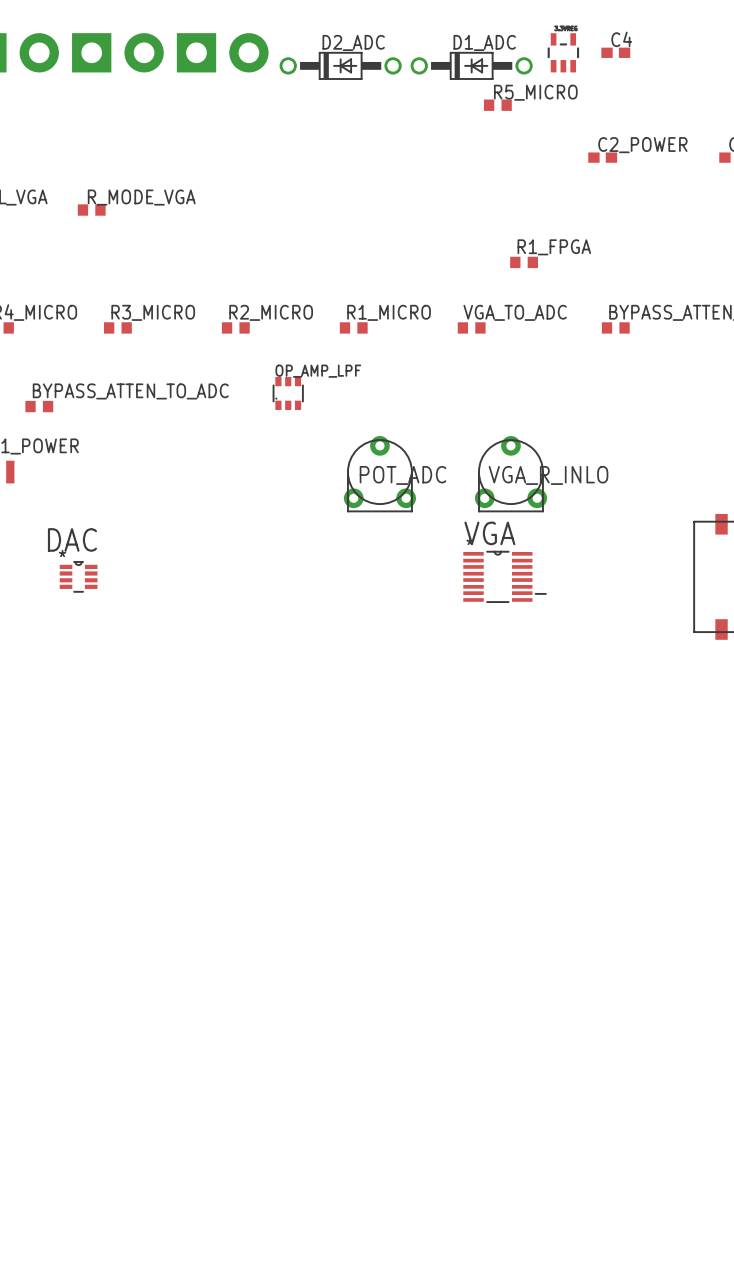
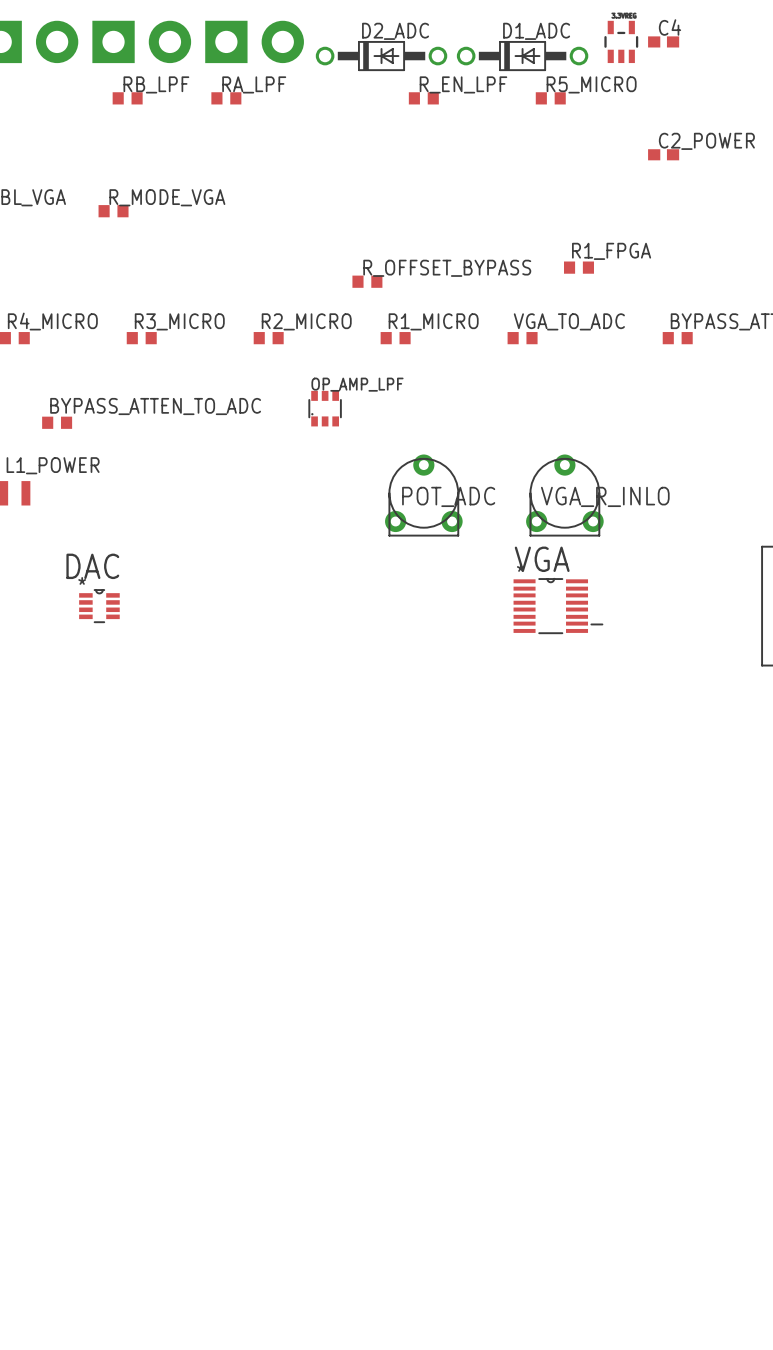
C4 position: (615, 52) -> (663, 41)
RB_LPF: none -> (127, 98)
RA_LPF: none -> (226, 98)
R_EN_LPF: none -> (423, 98)
R_OFFSET_BYPASS: none -> (367, 281)

